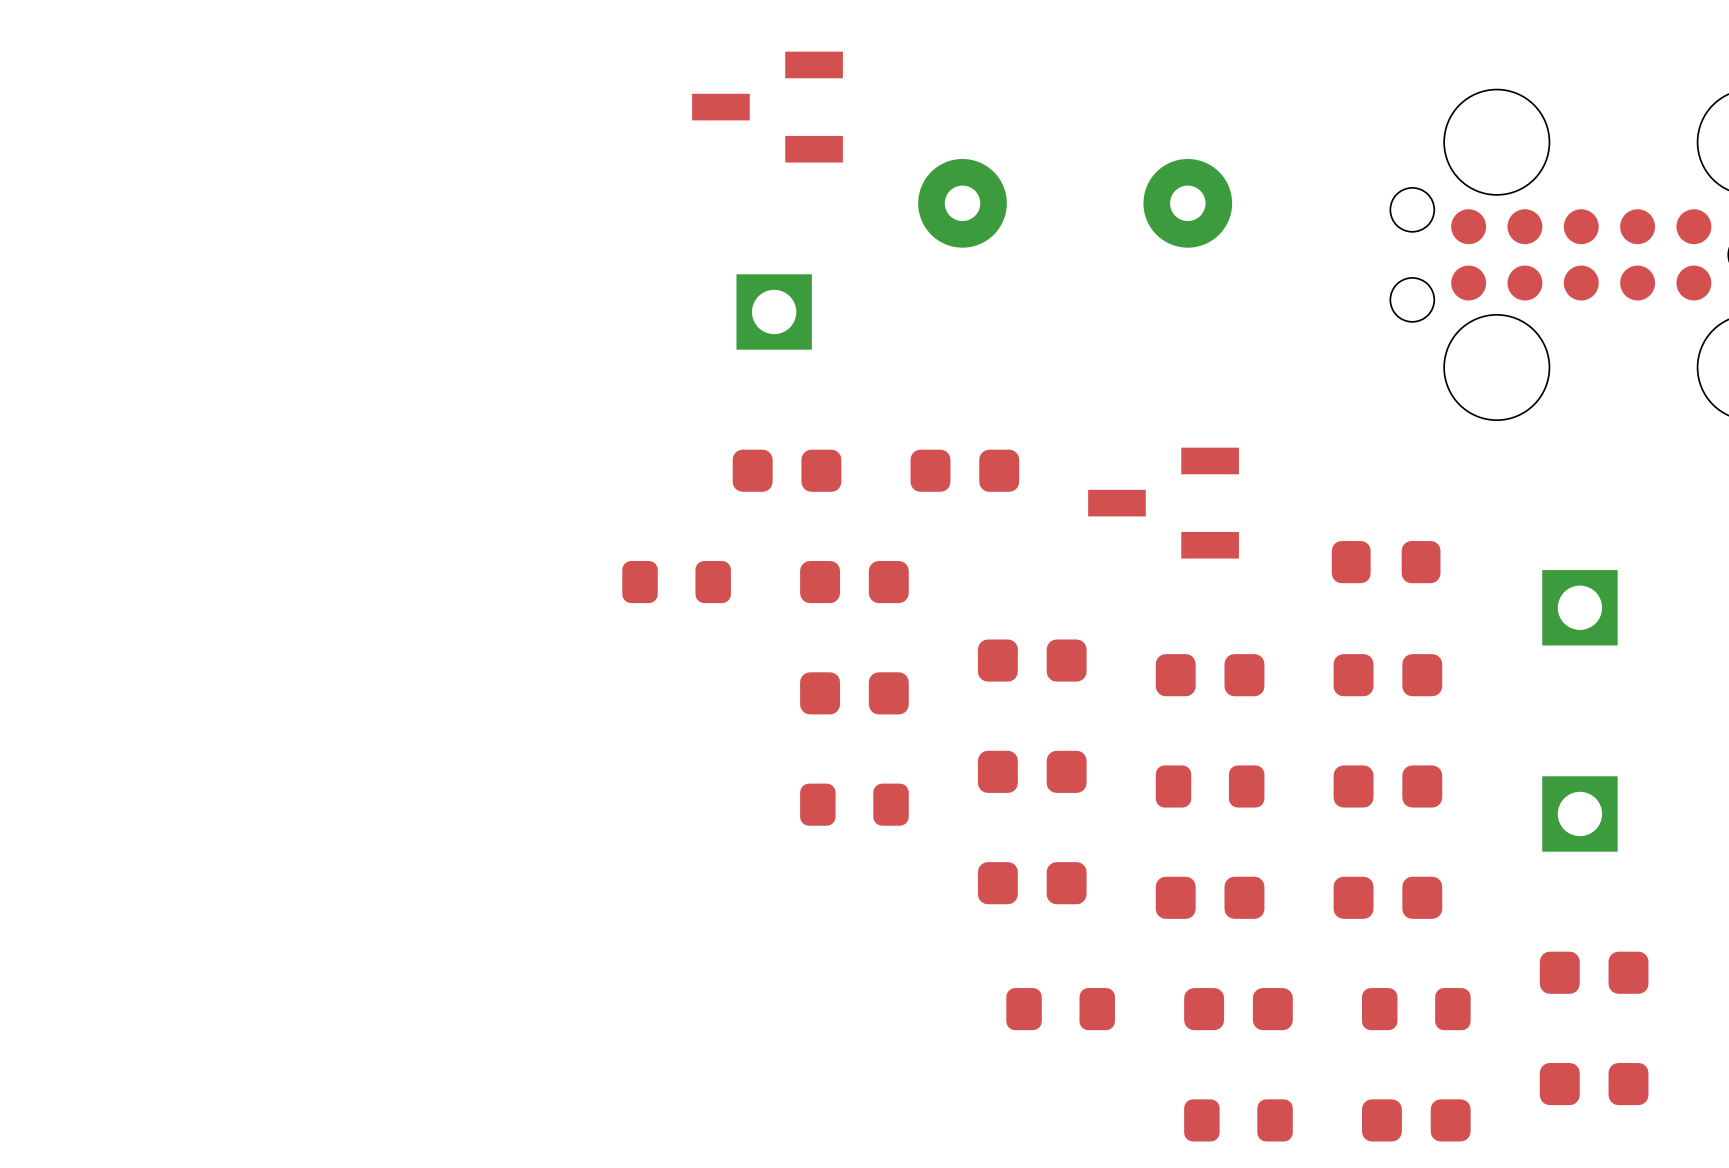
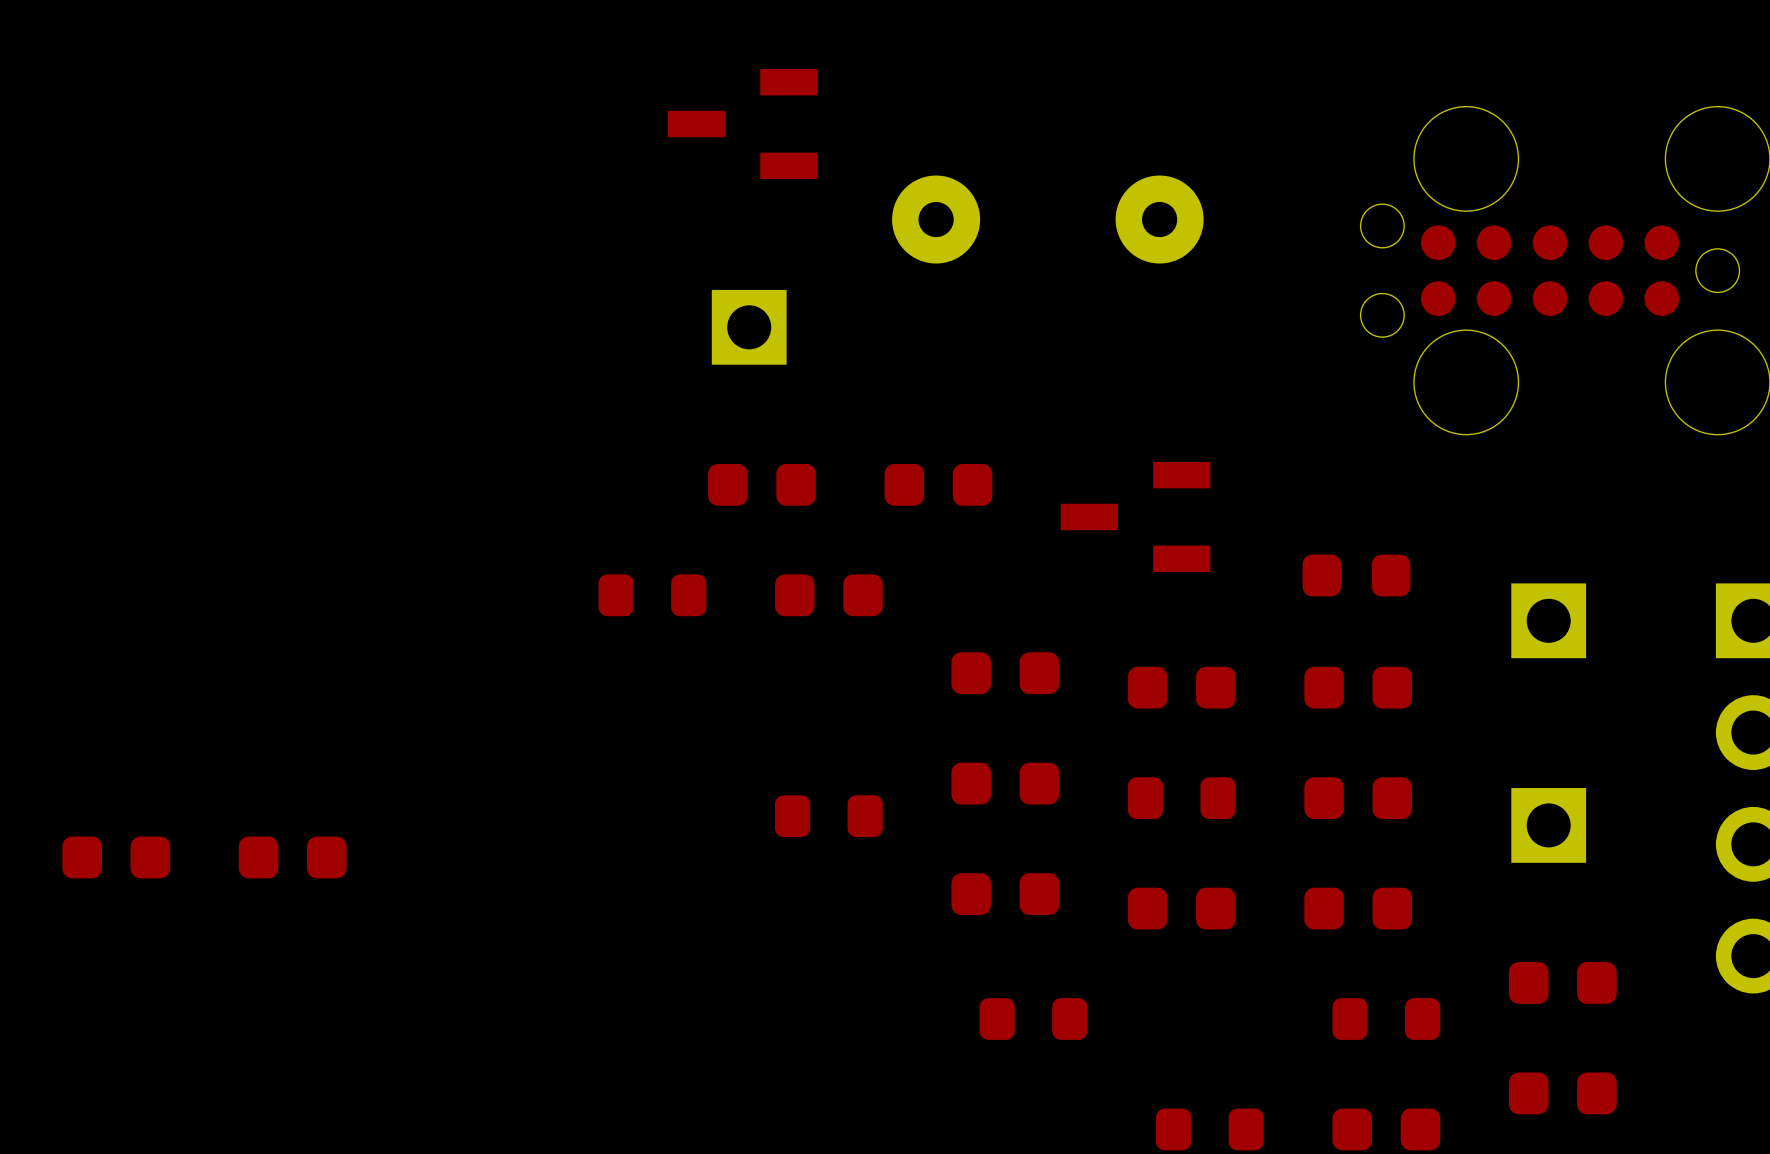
part: (854, 693) -> none
part: none -> (116, 857)
part: none -> (292, 857)
part: (1238, 1009) -> none

